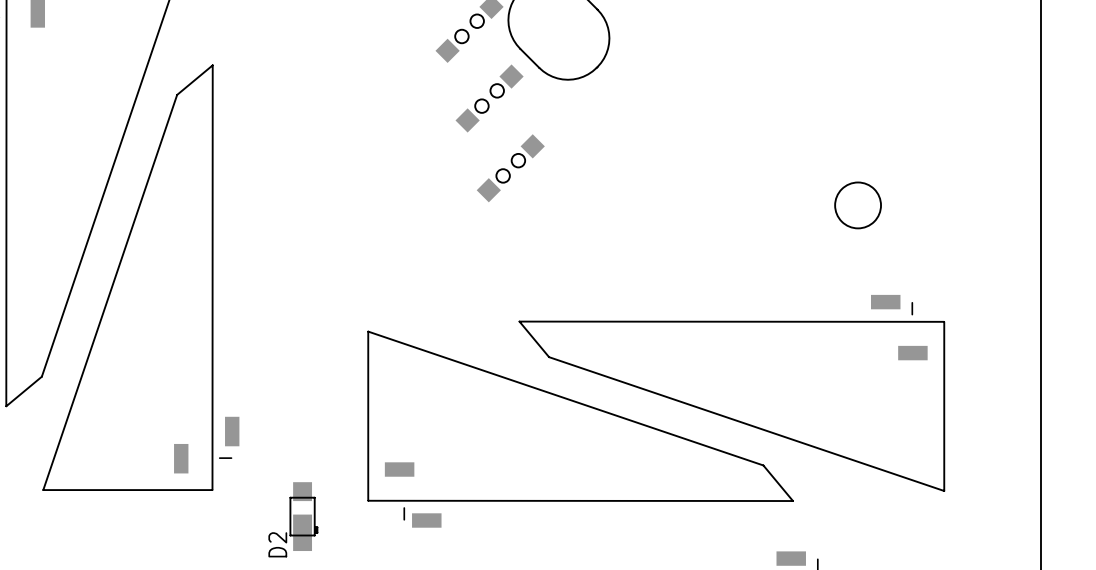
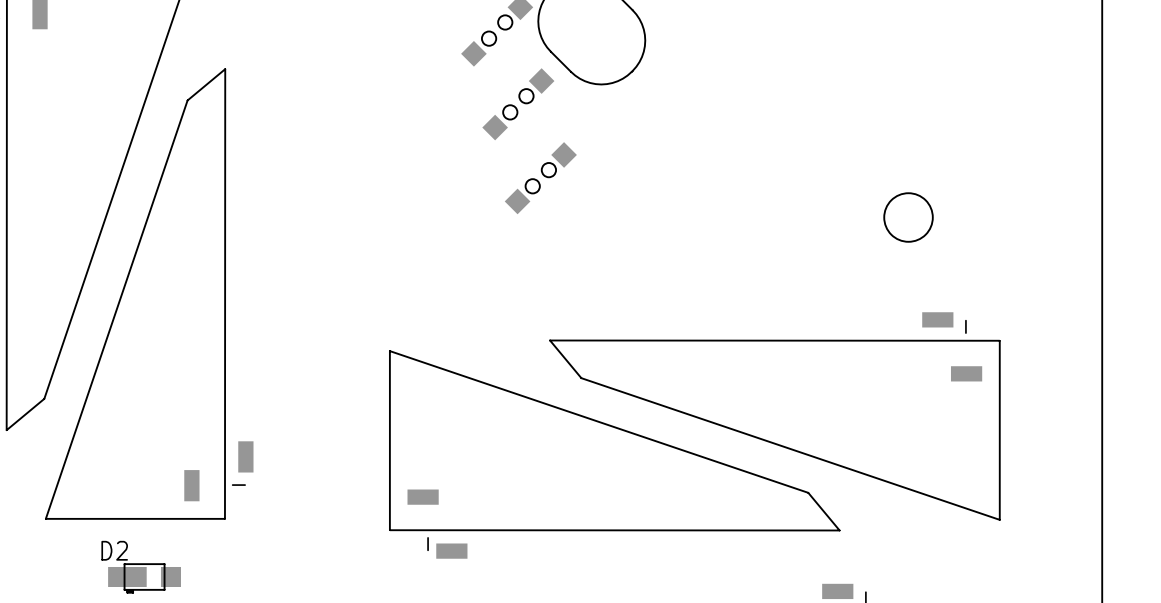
D2 rotation: 0° (303, 516) -> 90° clockwise (144, 578)
D2 position: (303, 516) -> (144, 578)

